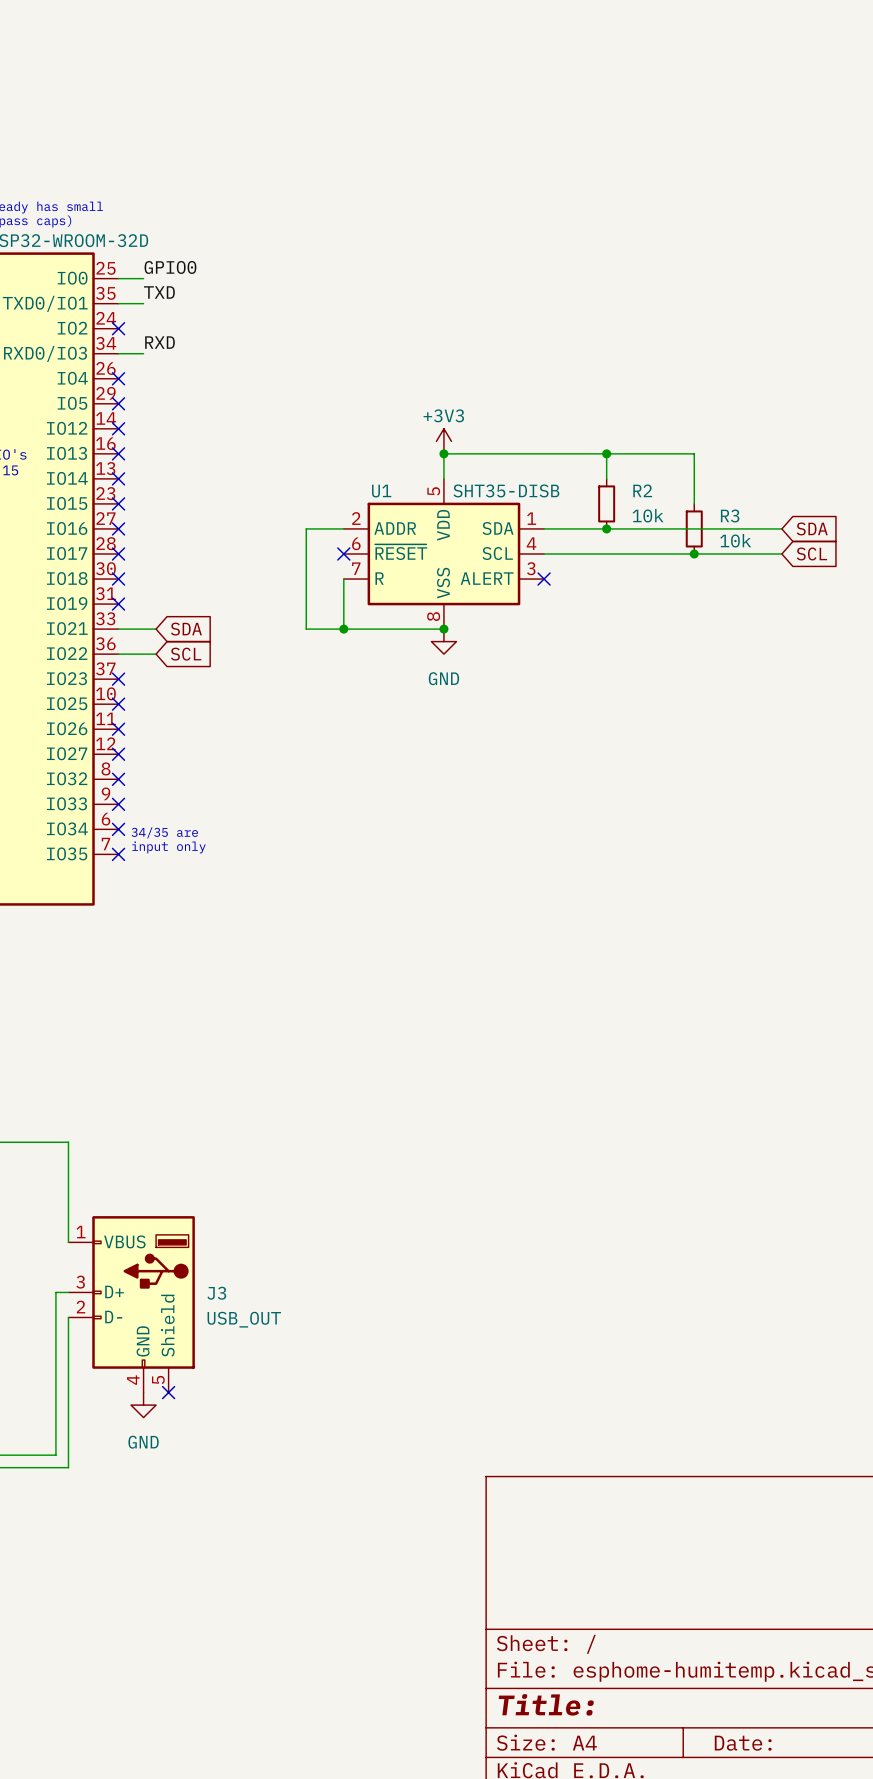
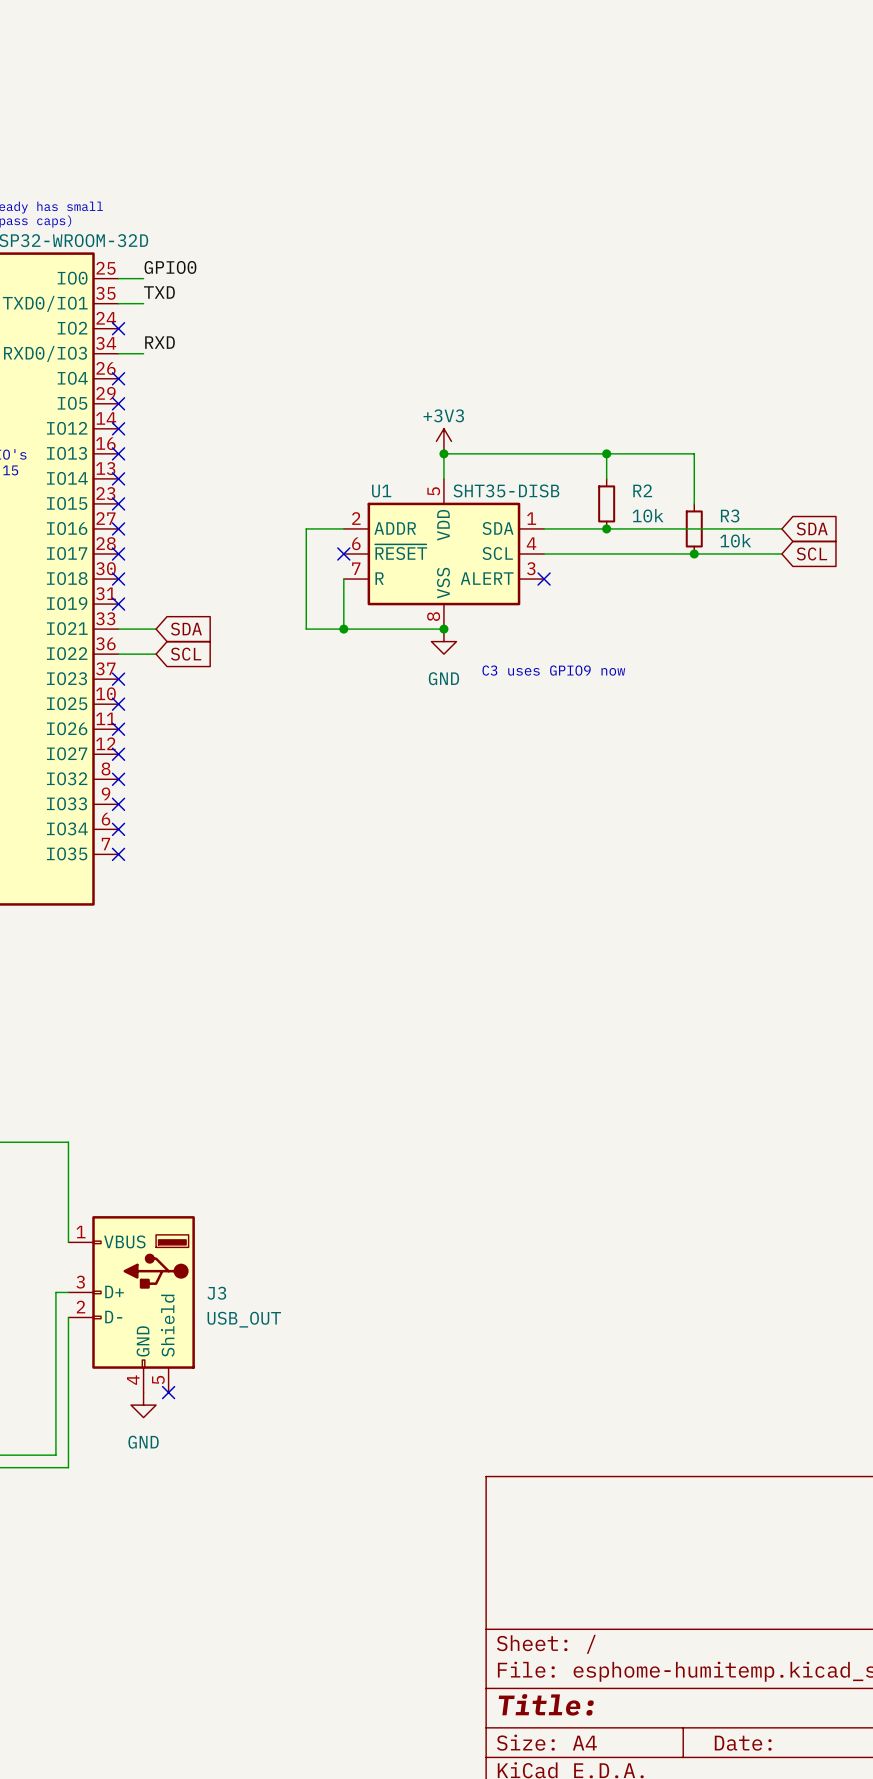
text: none -> C3 uses GPIO9 now (553, 670)
text: 34/35 are (164, 832) -> none
text: input only (169, 847) -> none

